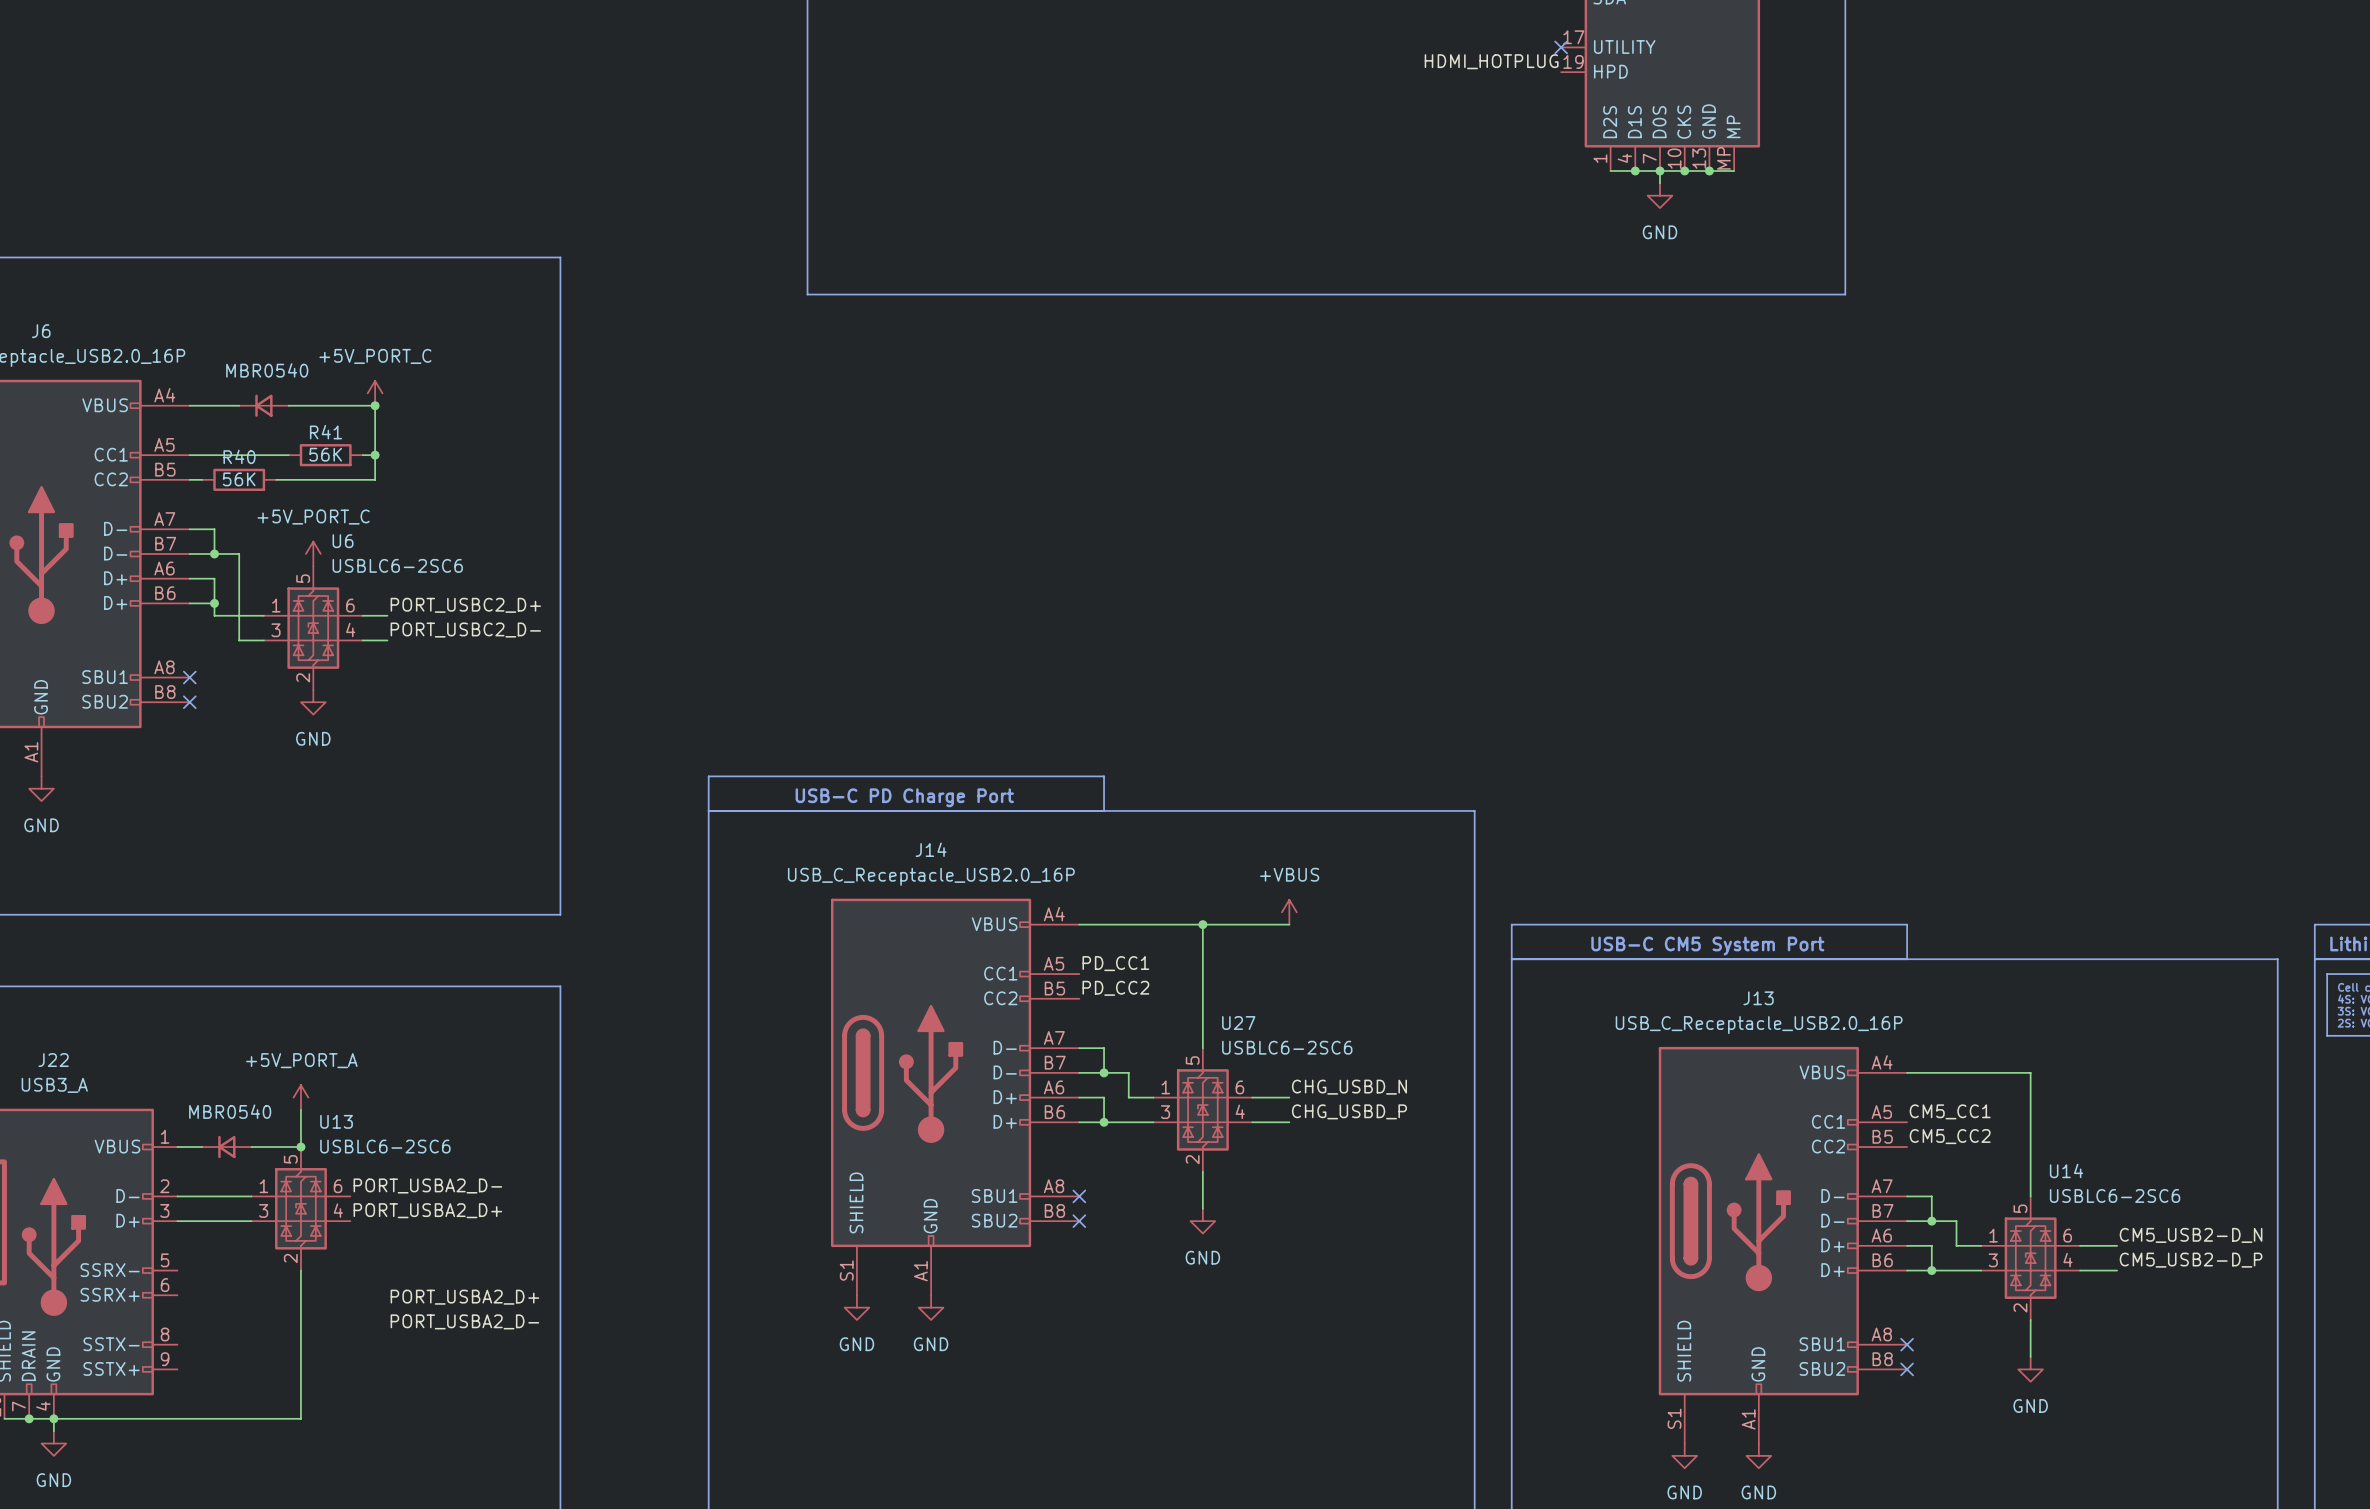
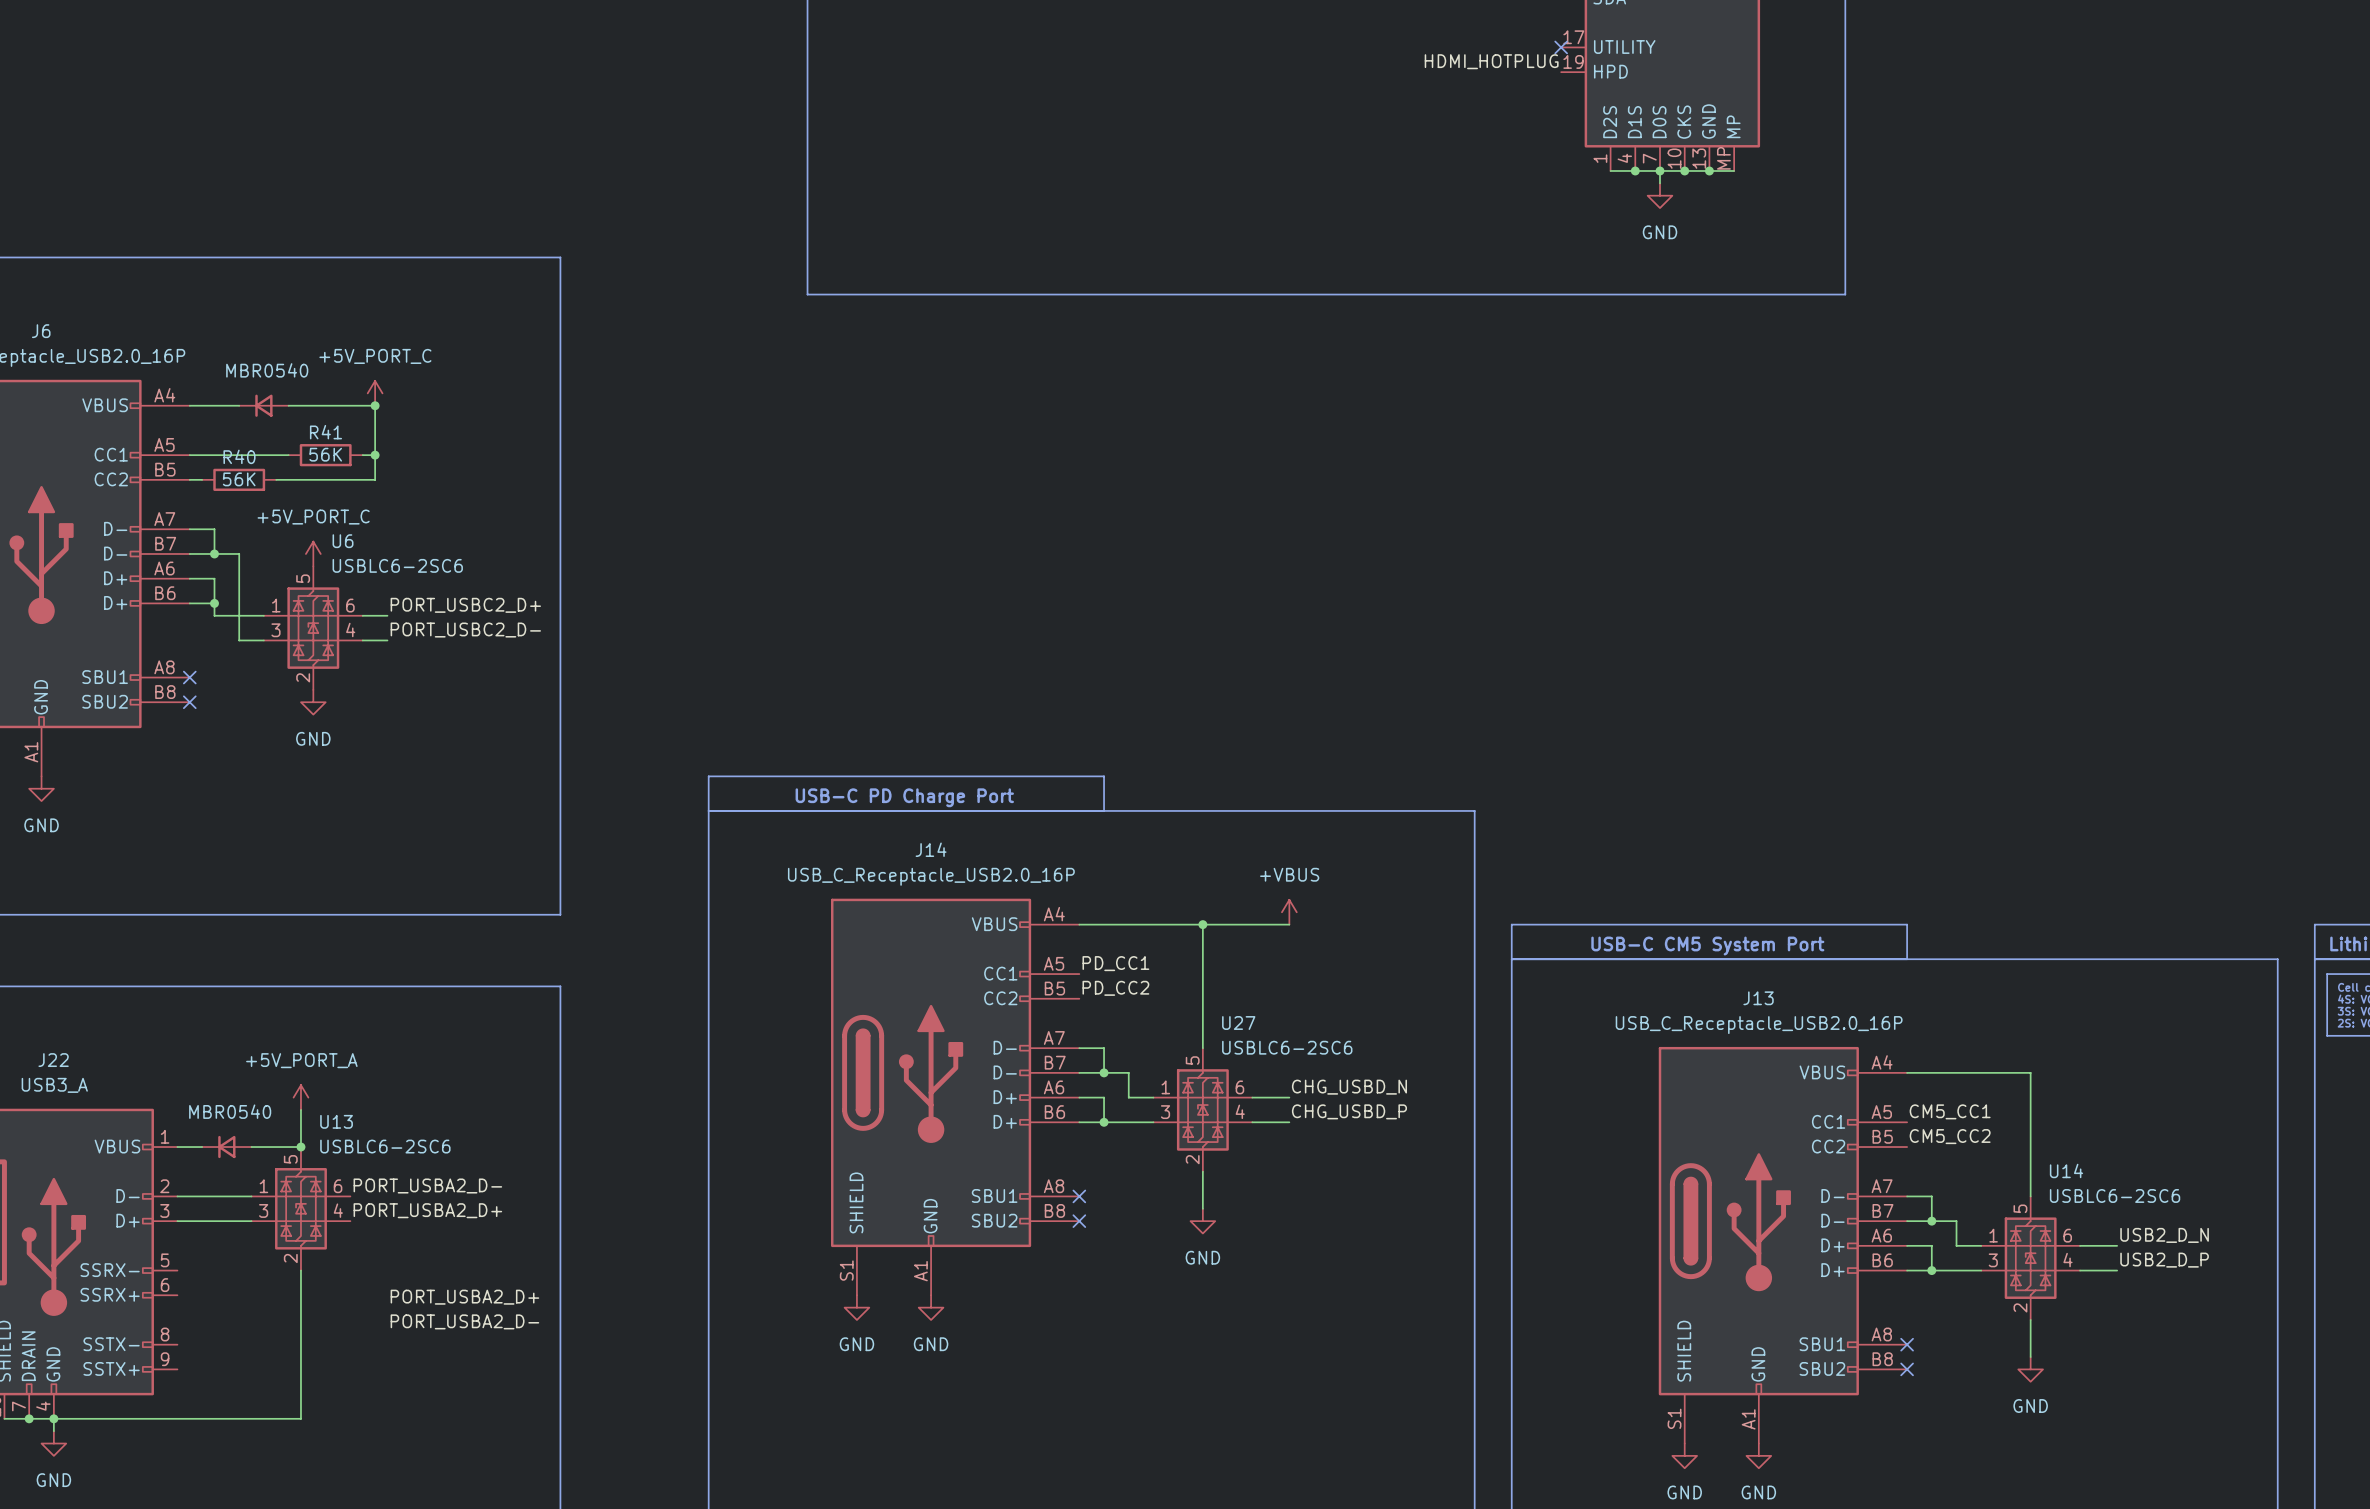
label: CM5_USB2-D_N (2191, 1235) -> USB2_D_N (2164, 1235)
label: CM5_USB2-D_P (2191, 1260) -> USB2_D_P (2164, 1260)

